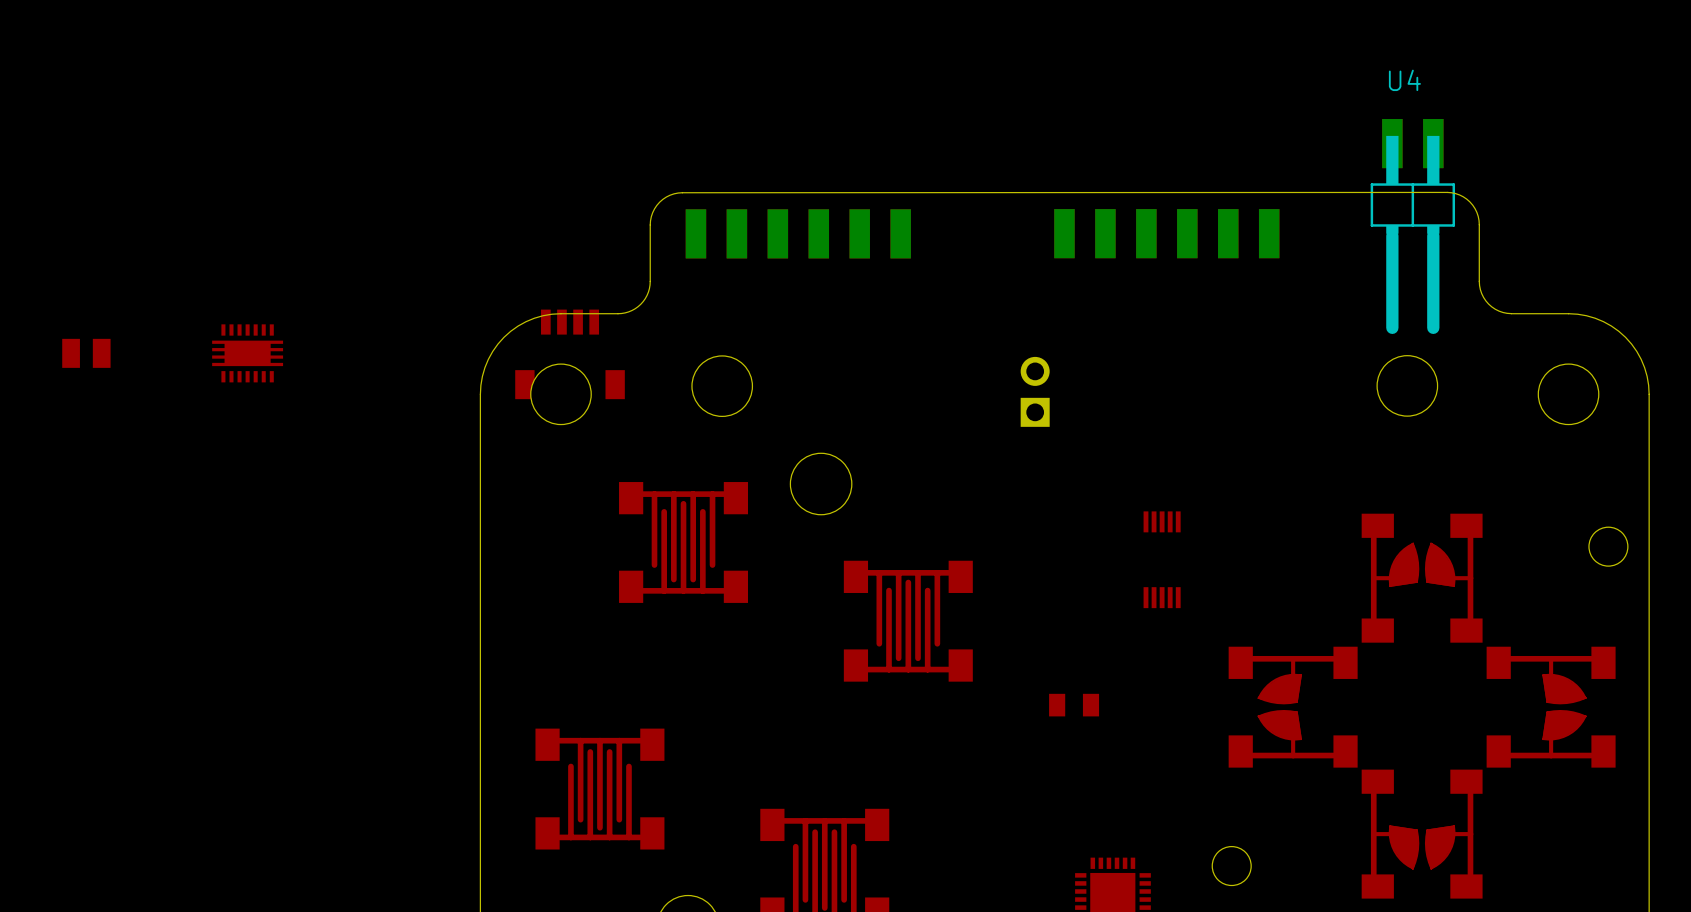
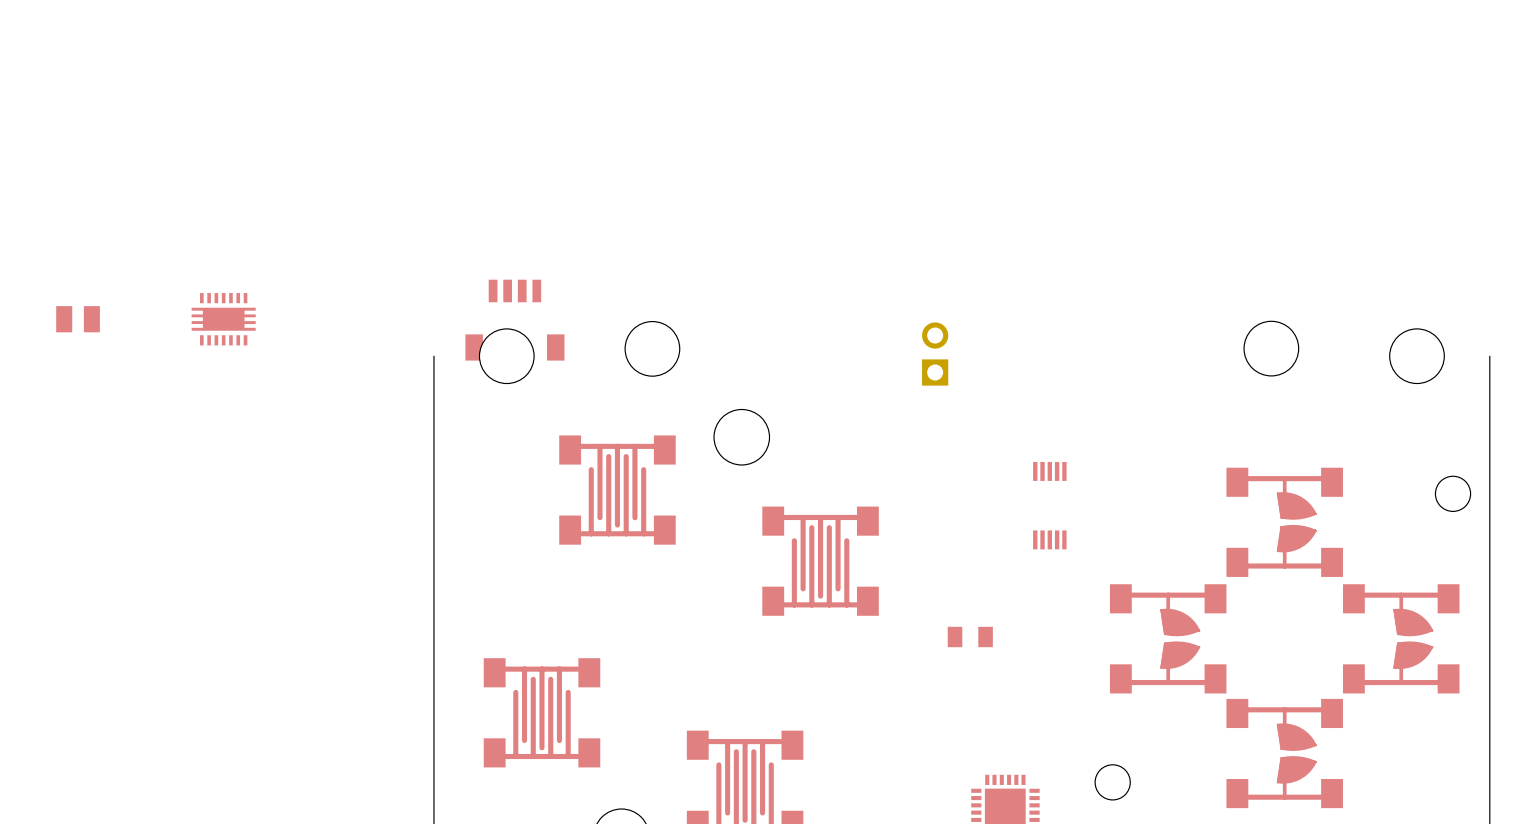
drawing: [479, 192, 1650, 395] -> none
U4: (1412, 226) -> none
part: (798, 233) -> none
part: (1166, 233) -> none
part rotation: 0° (683, 542) -> 180° (617, 490)
part rotation: 0° (1422, 578) -> 90° clockwise (1284, 522)
part rotation: 0° (908, 621) -> 180° (820, 561)
part rotation: 0° (1293, 707) -> 180° (1168, 638)
part rotation: 0° (1422, 834) -> 90° counterclockwise (1284, 753)

